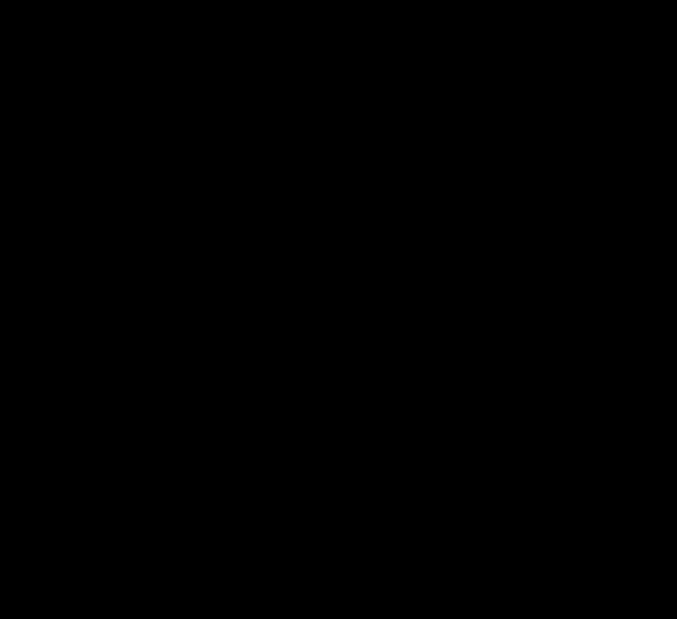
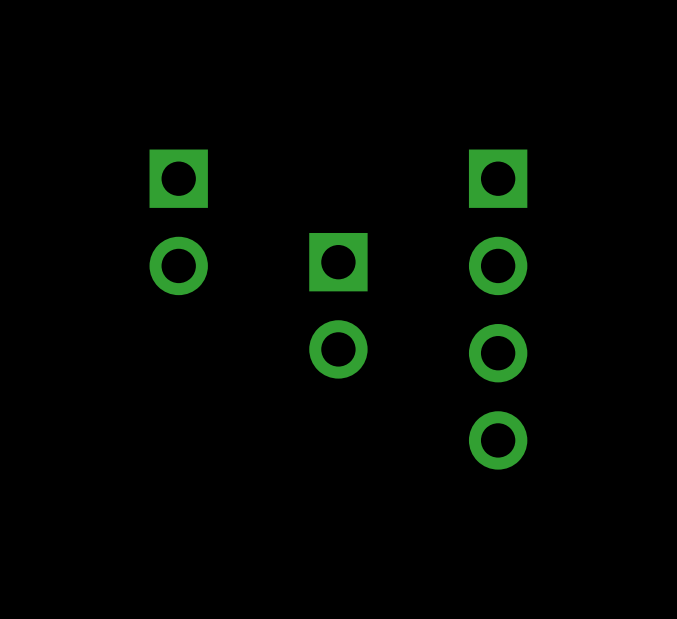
part: none -> (178, 222)
part: none -> (338, 305)
part: none -> (498, 309)

